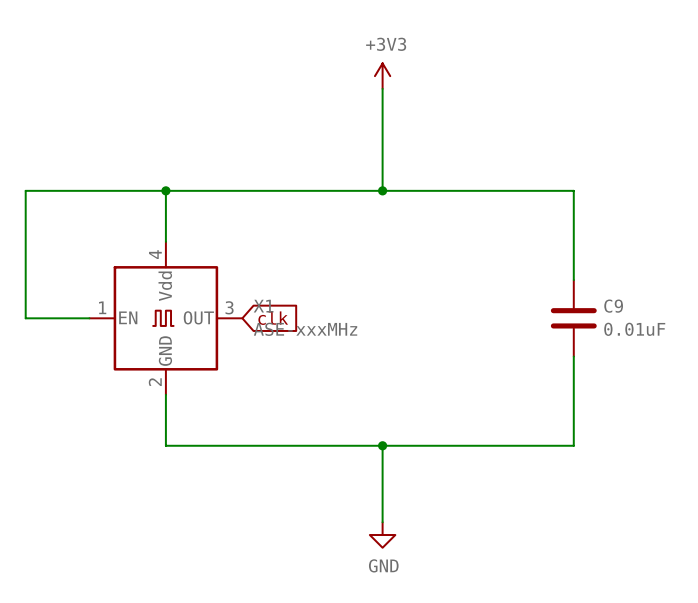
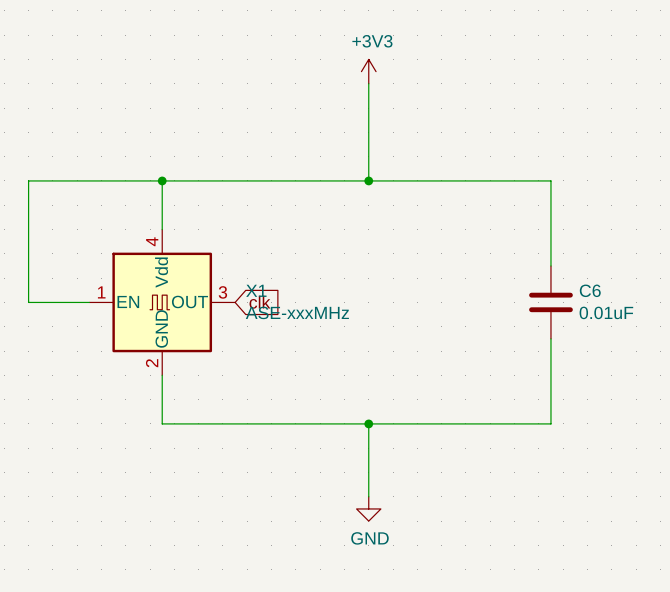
C9 name: C9 (613, 306) -> C6 (590, 290)

